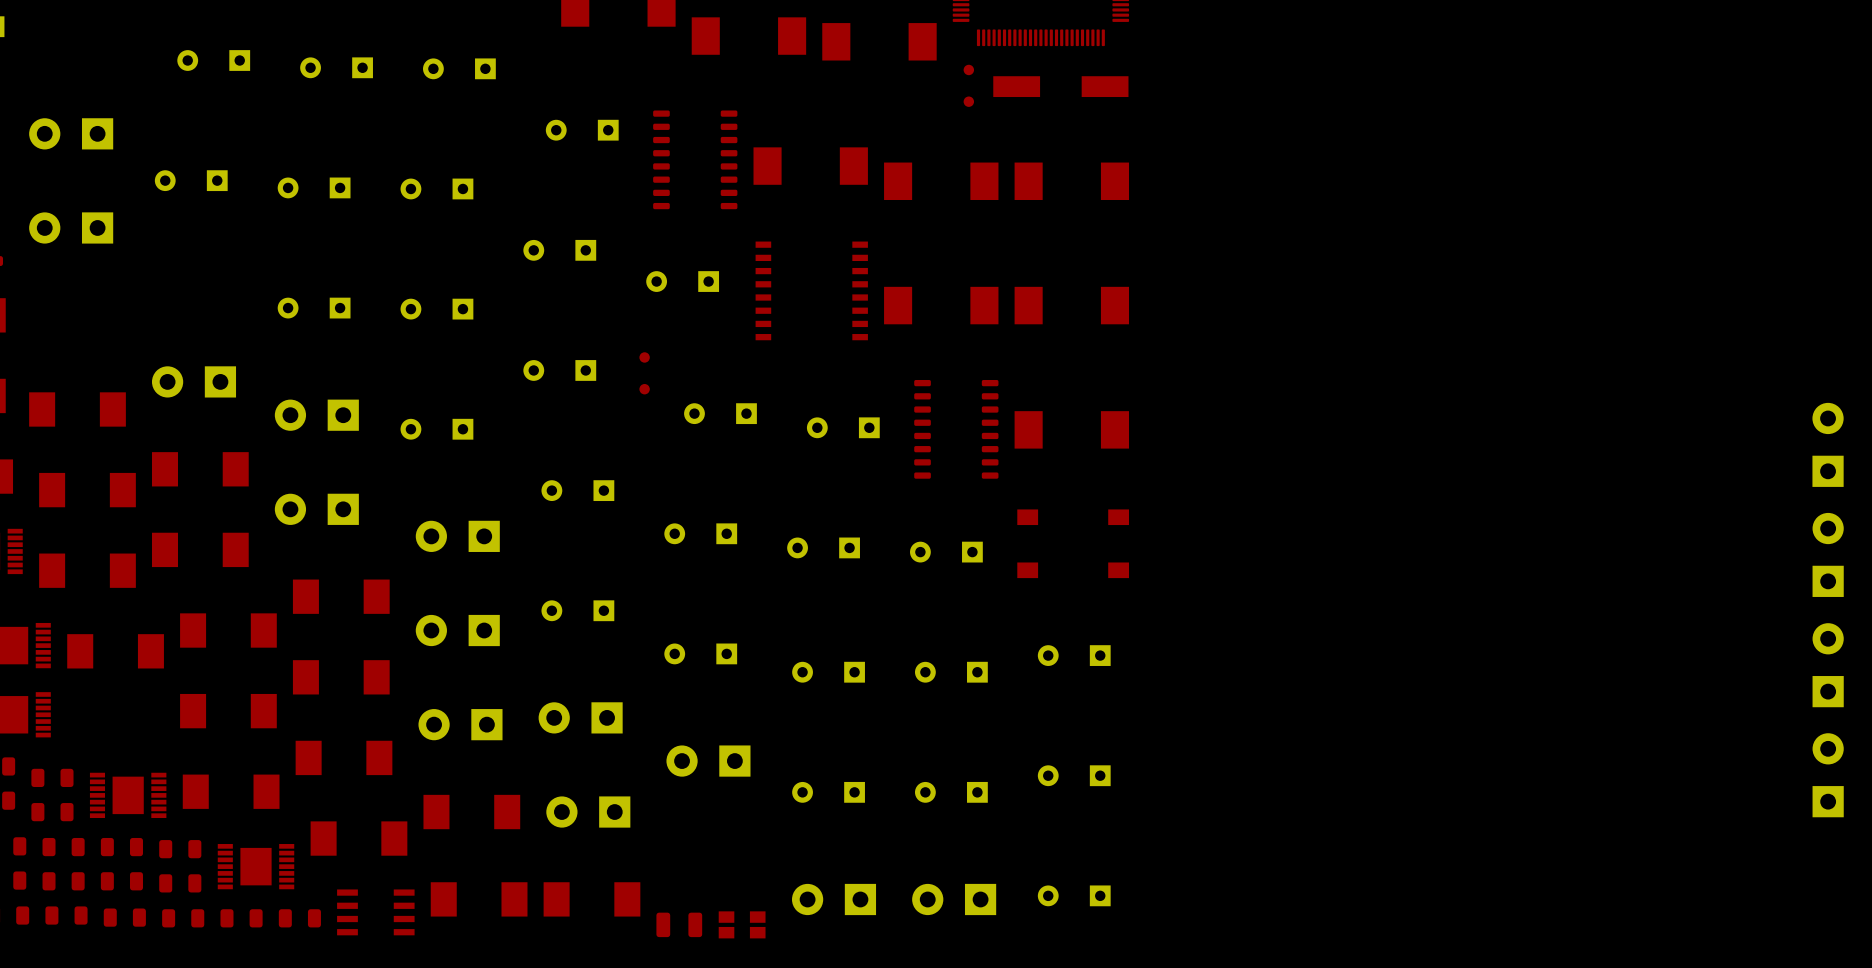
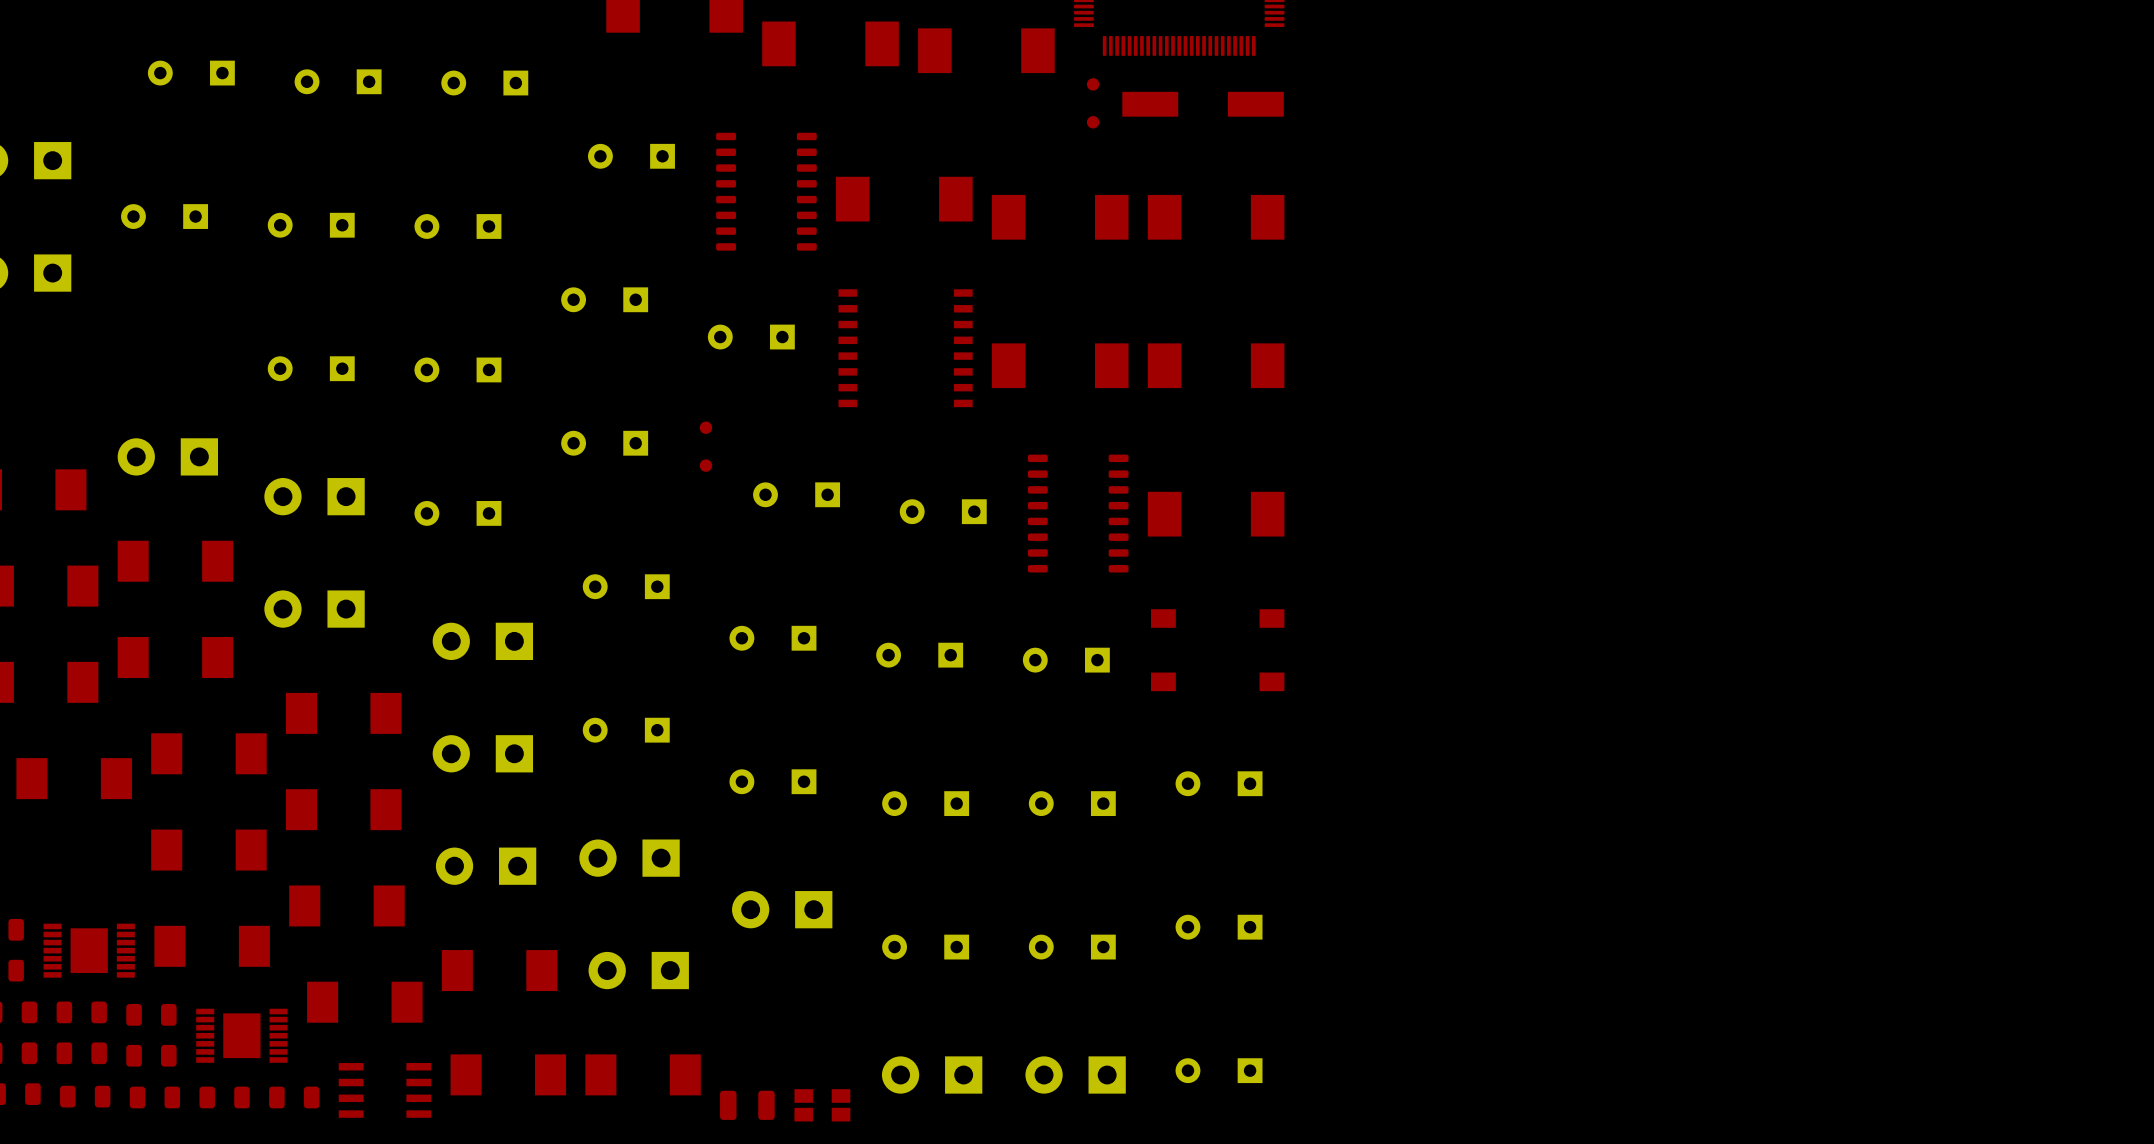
part: (1828, 444) -> none
part: (1828, 554) -> none
part: (1828, 665) -> none
part: (1828, 775) -> none

